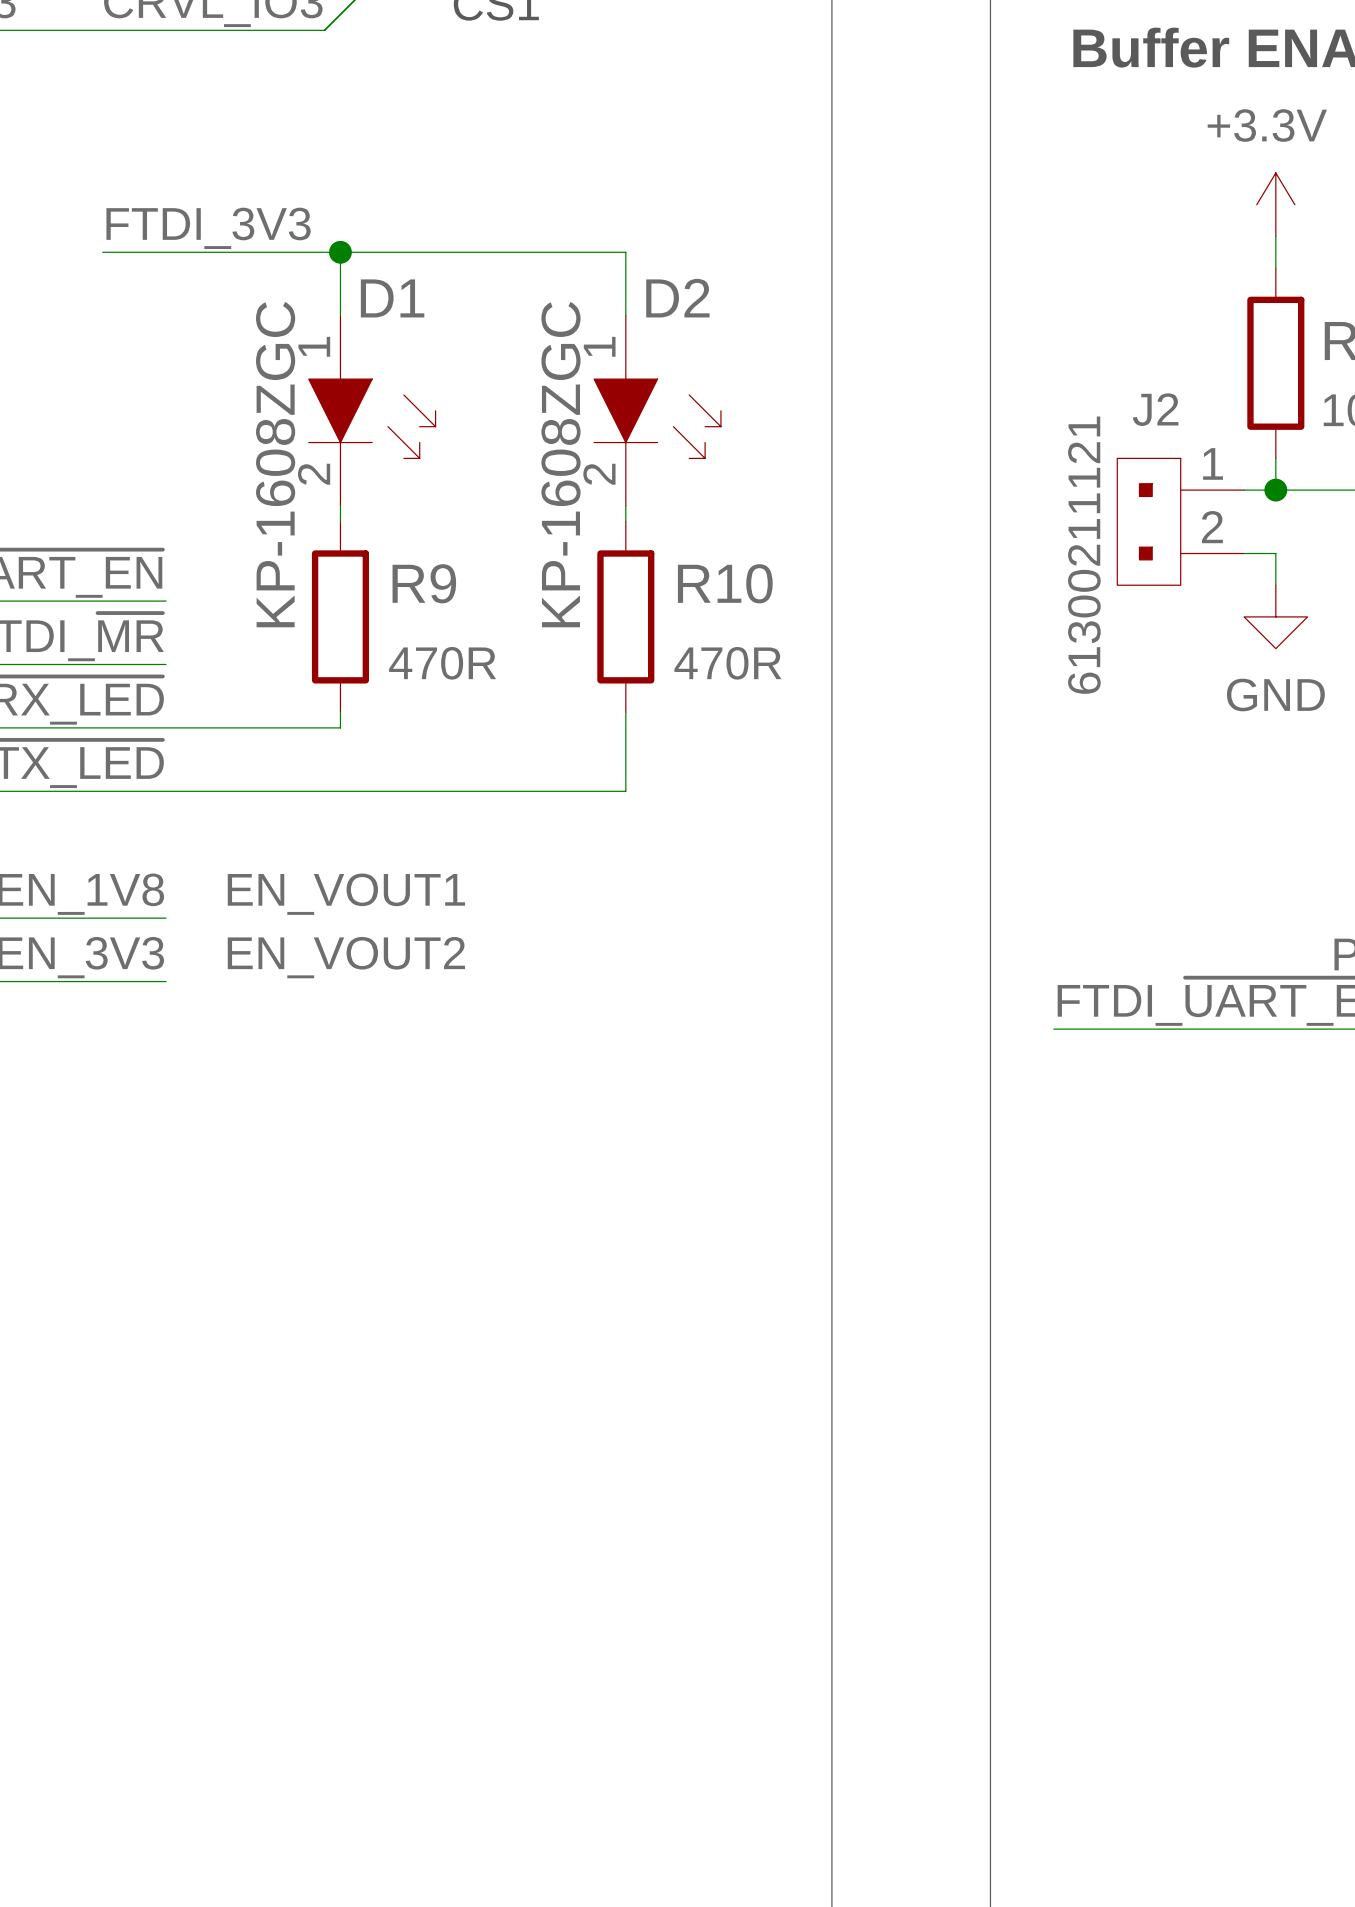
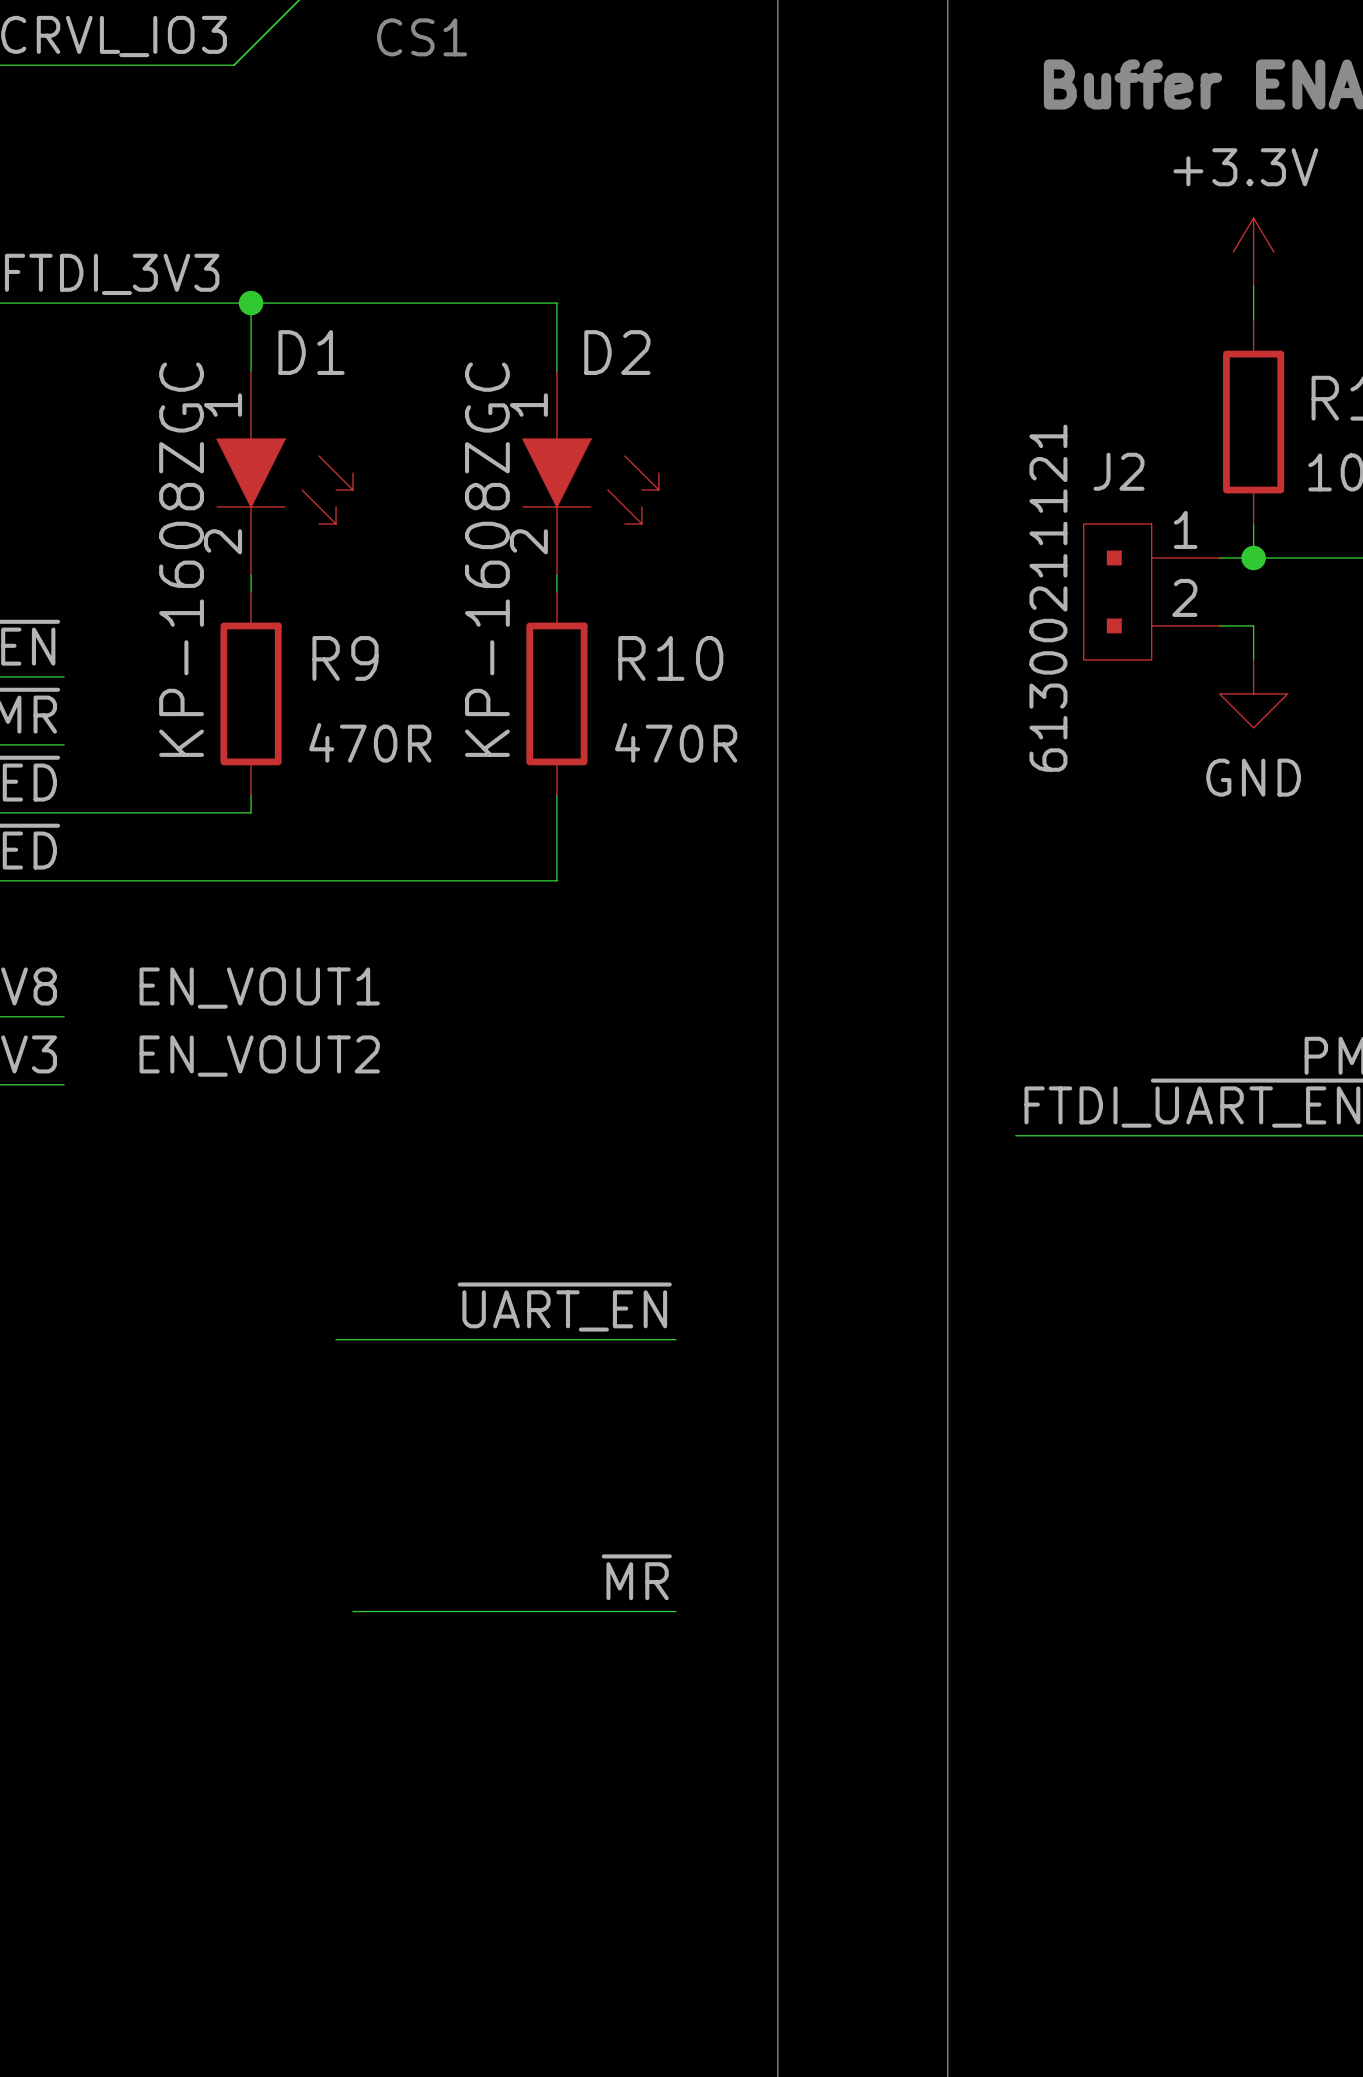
label: none -> ~{UART_EN} (564, 1307)
wire: none -> (336, 1339) (675, 1339)
label: none -> ~{MR} (636, 1577)
wire: none -> (353, 1611) (675, 1611)

